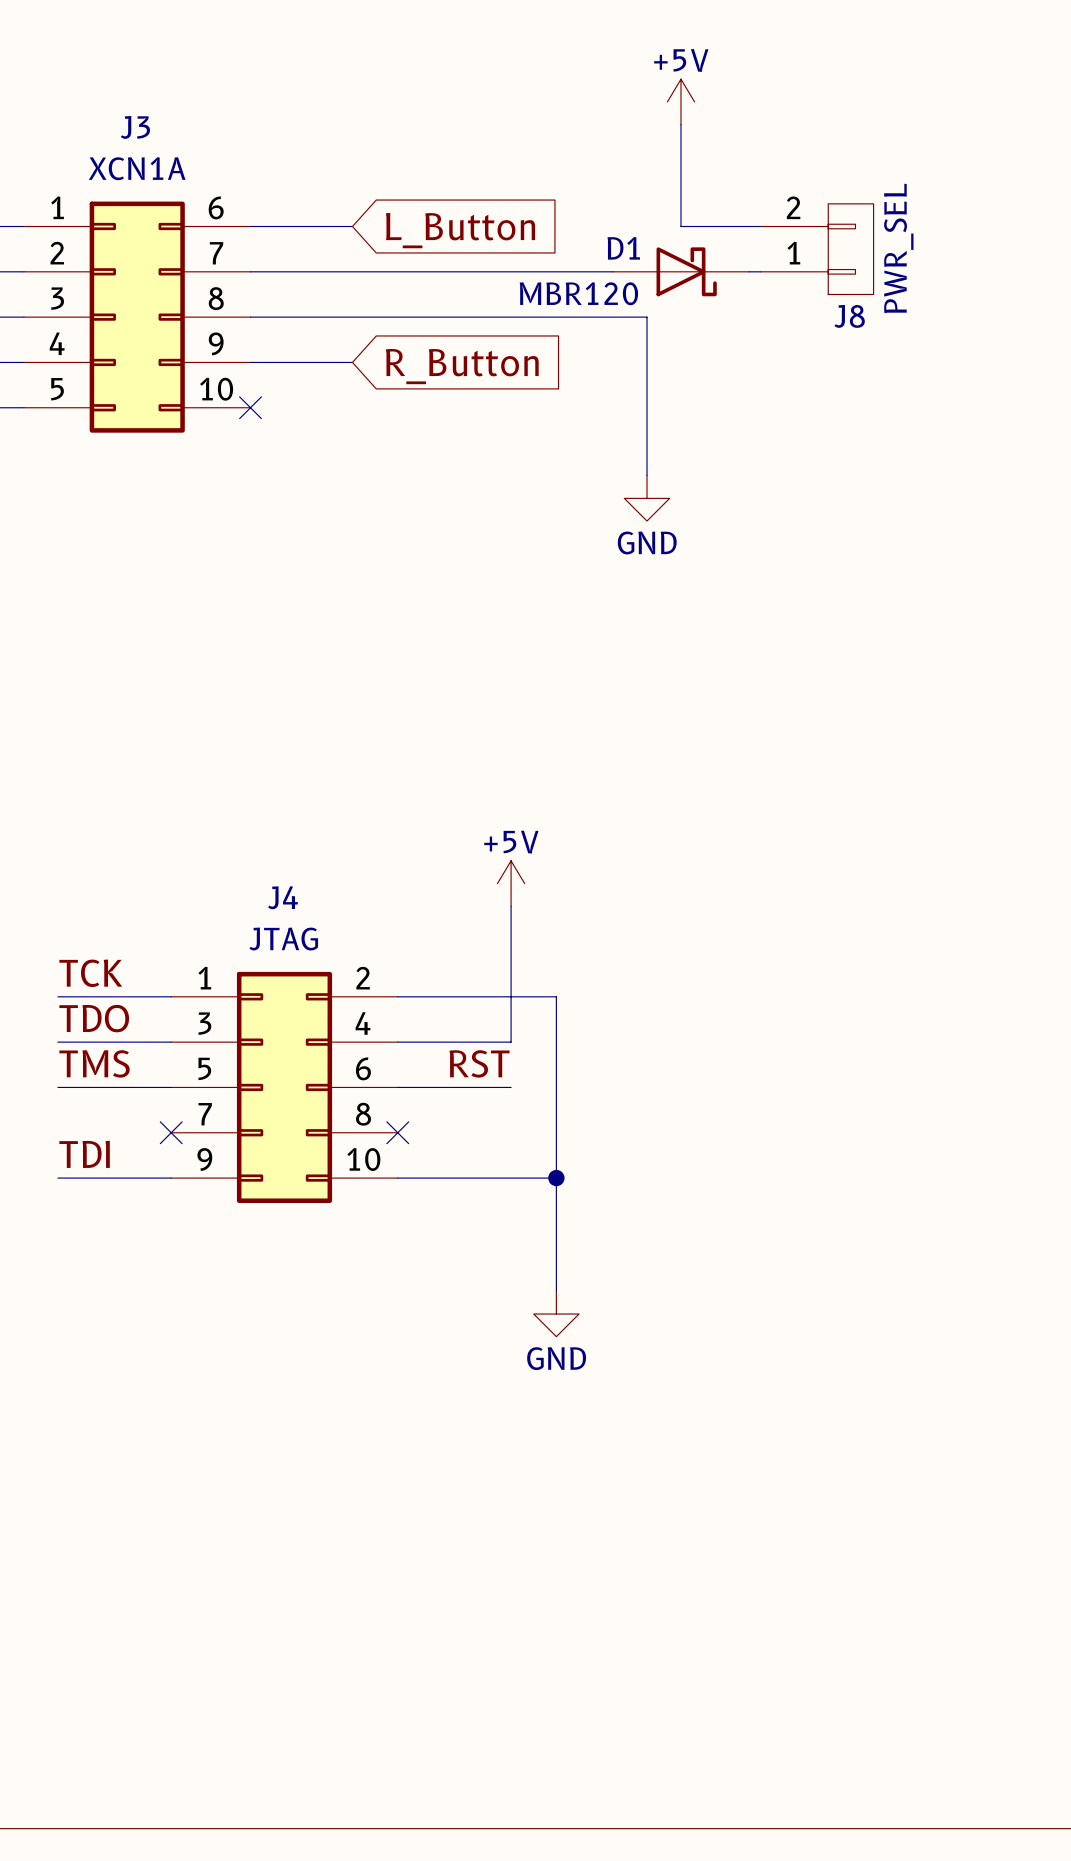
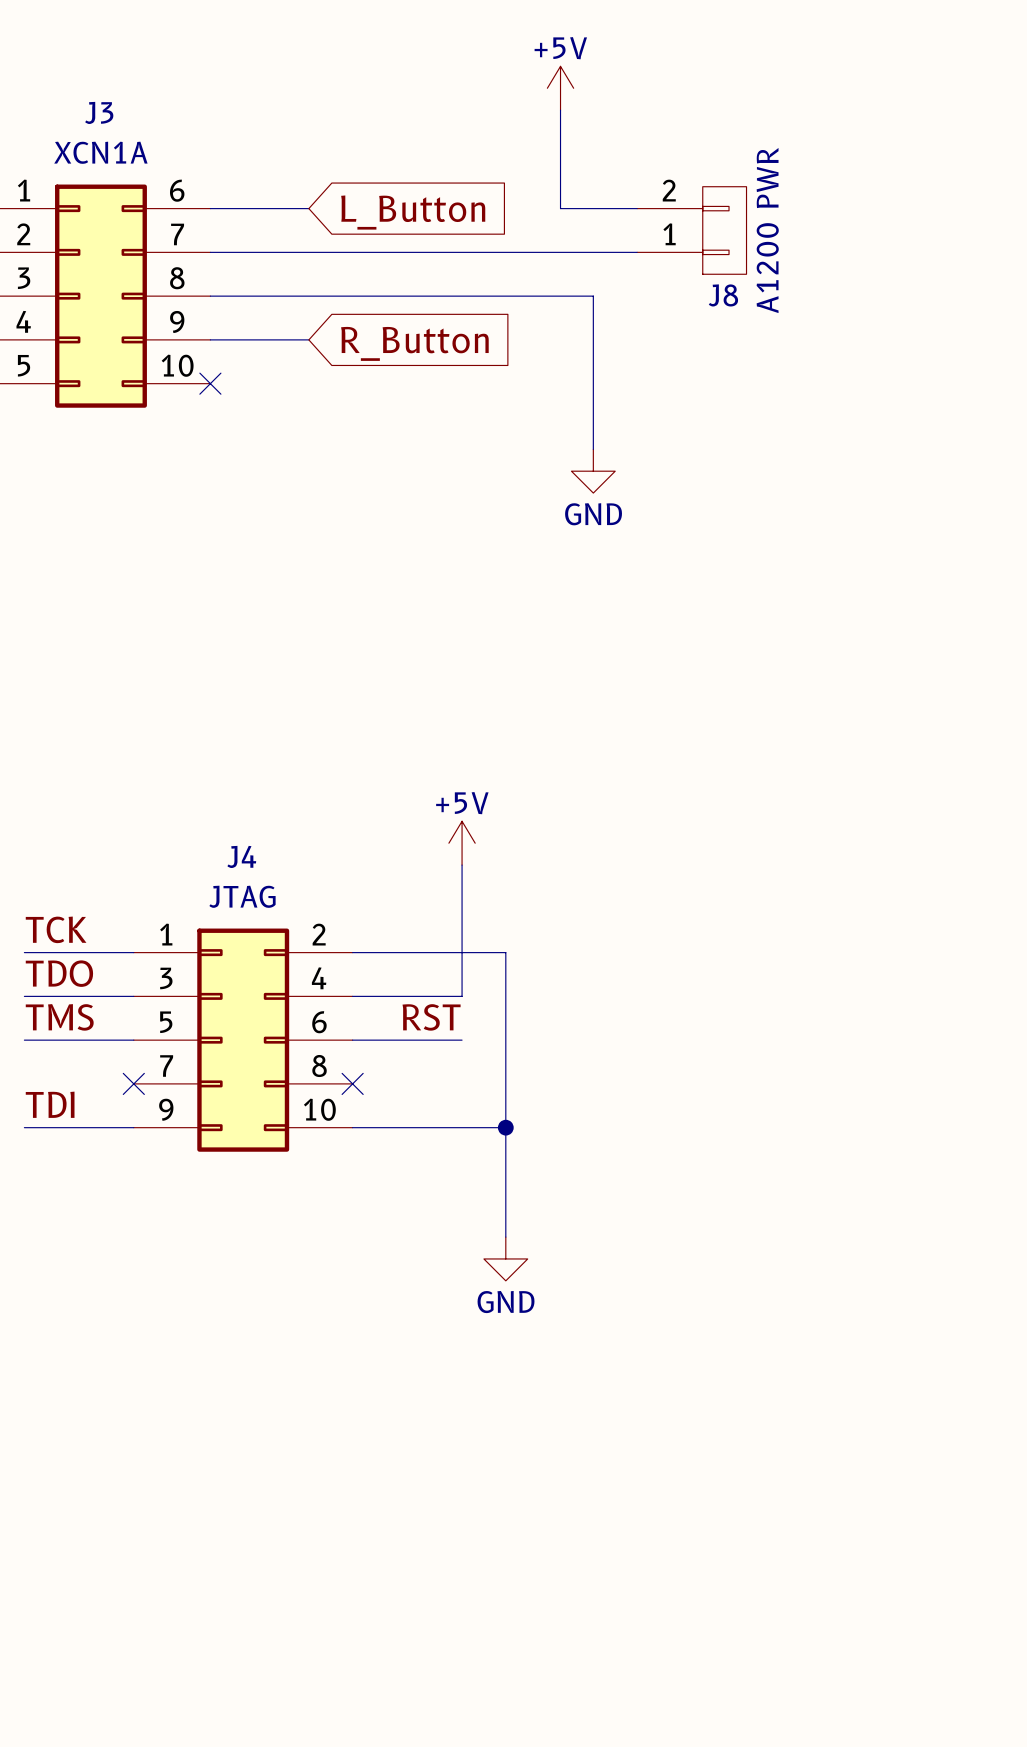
power symbol position: +5V (680, 101) -> +5V (560, 88)
wire: (680, 124) (680, 226) -> (560, 110) (560, 208) (626, 208)
J8 value: PWR_SEL (898, 248) -> A1200 PWR (767, 230)
J8 position: (816, 249) -> (691, 230)
D1: MBR120 (680, 271) -> none

